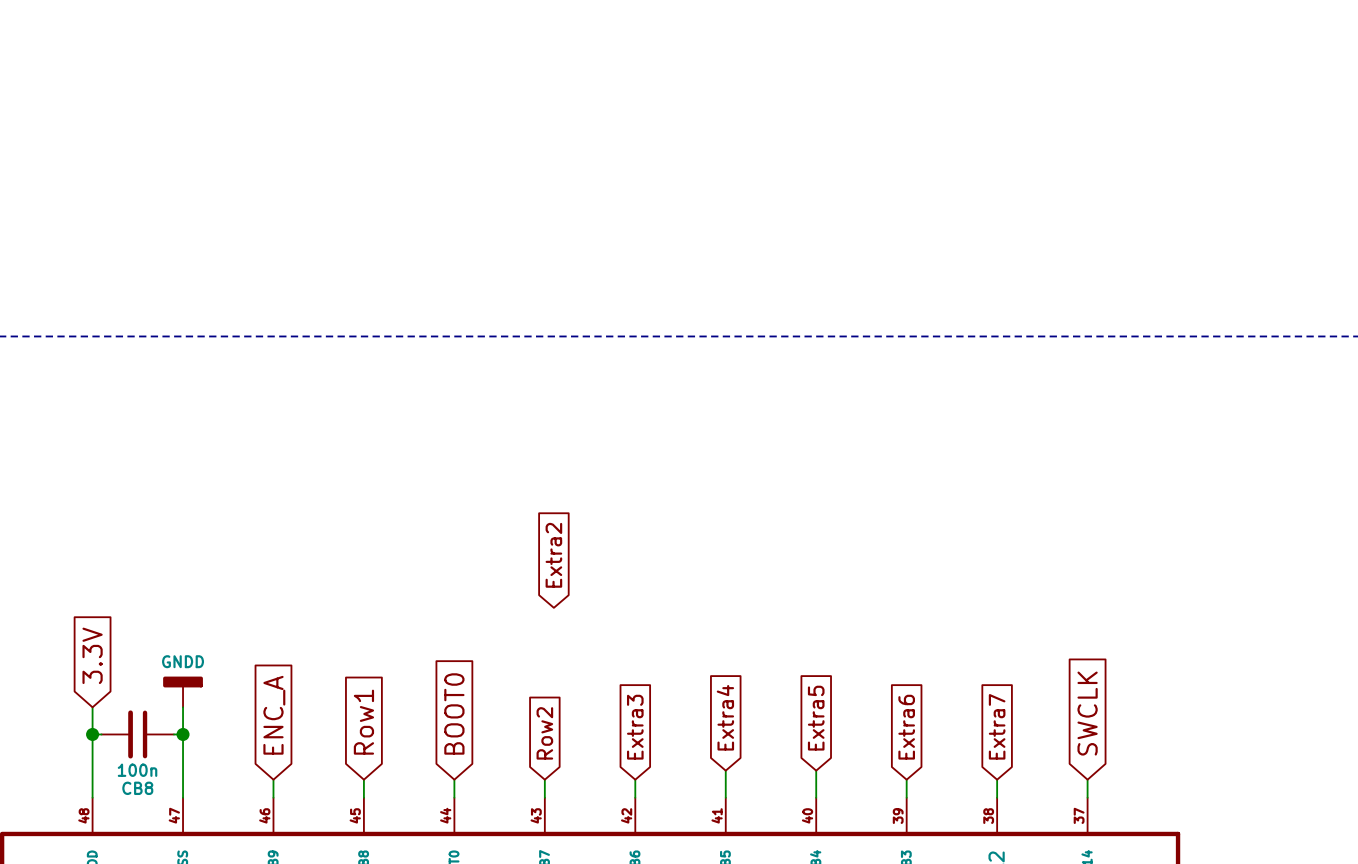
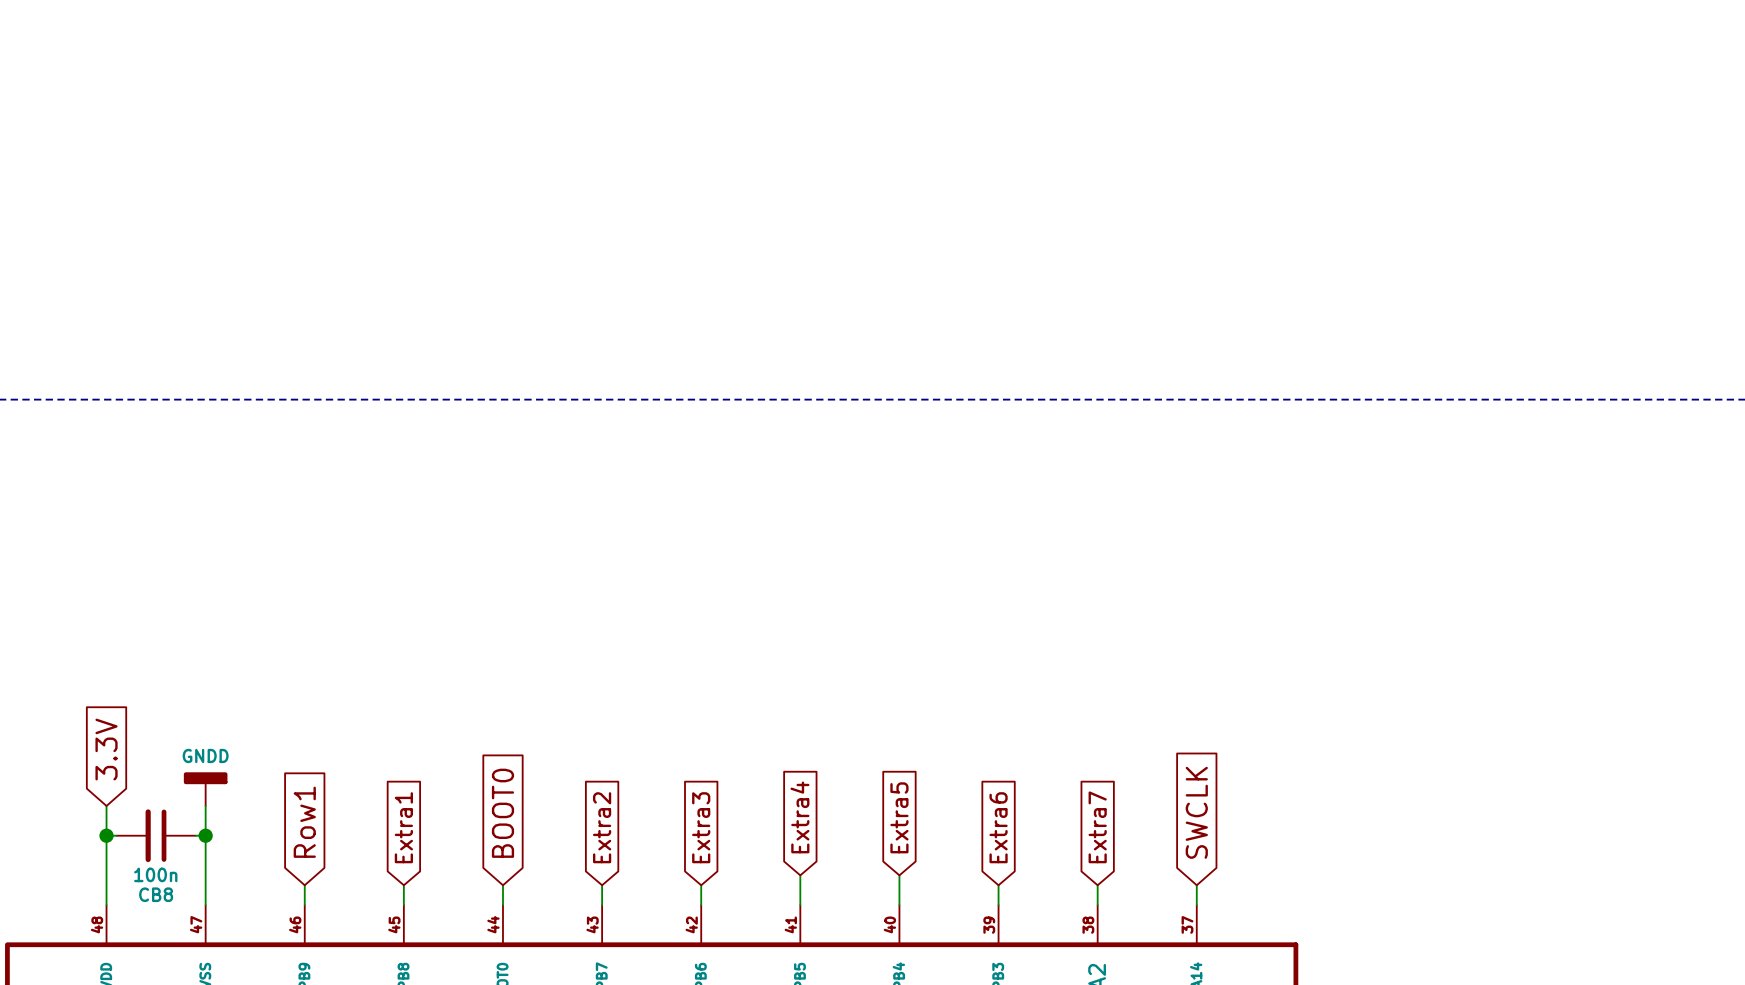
global label: Extra2 (553, 555) -> none
global label: ENC_A (274, 715) -> Row1 (304, 822)
global label: Row1 (363, 722) -> Extra1 (403, 827)
global label: Row2 (544, 733) -> Extra2 (602, 827)

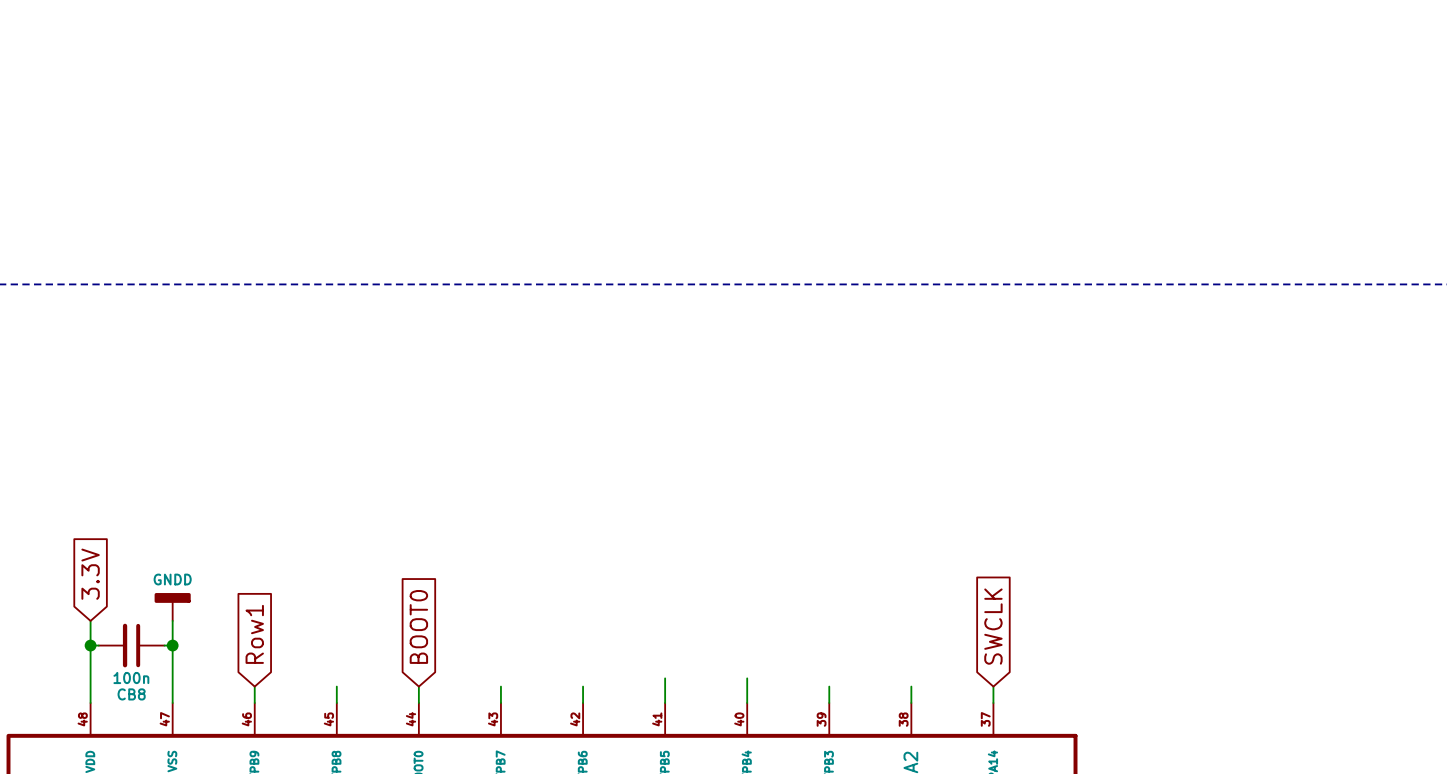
global label: Extra4 (799, 817) -> none
global label: Extra5 (899, 817) -> none
global label: Extra1 (403, 827) -> none
global label: Extra2 (602, 827) -> none
global label: Extra3 (701, 827) -> none
global label: Extra6 (998, 827) -> none
global label: Extra7 (1097, 827) -> none

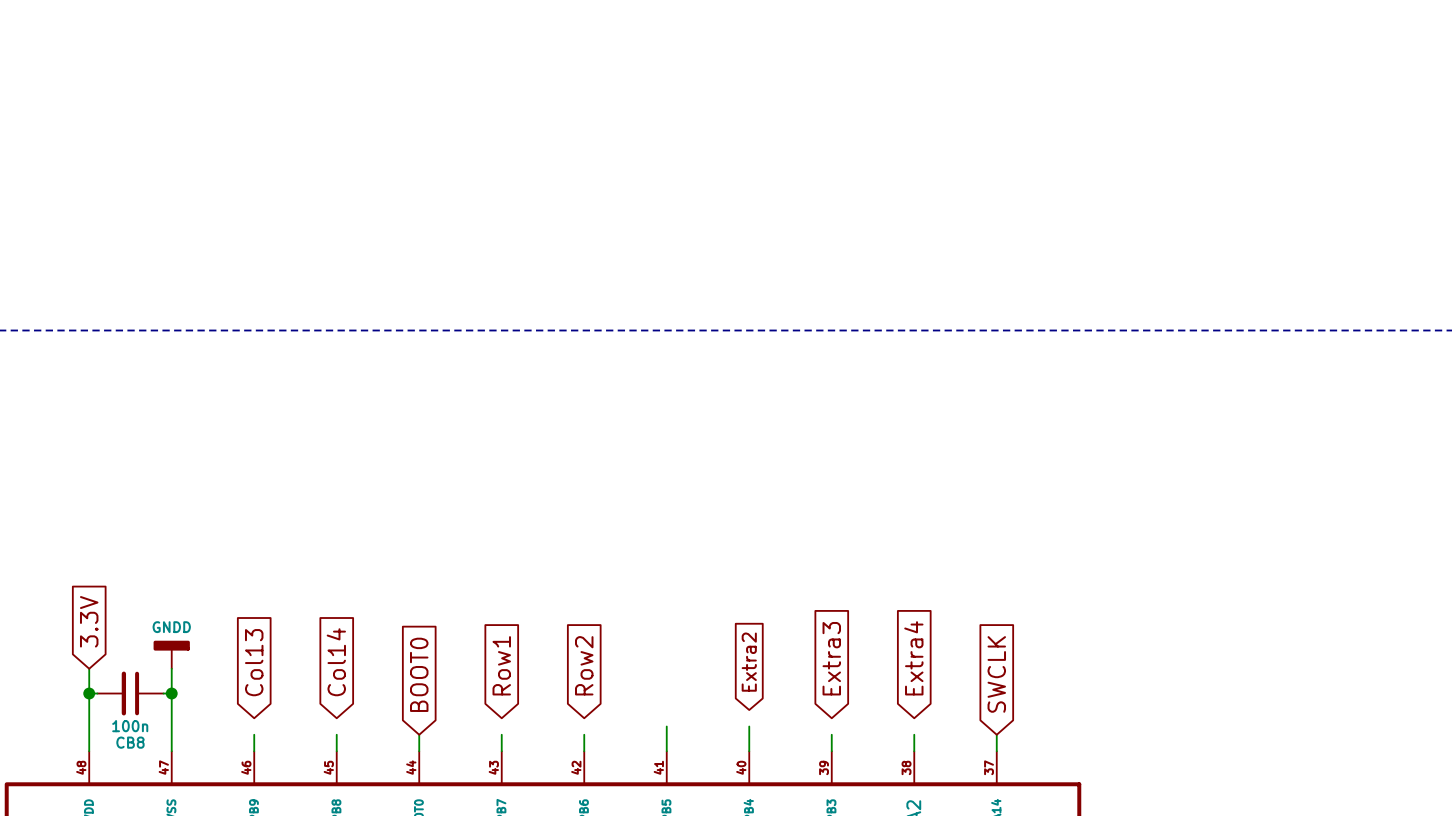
global label: none -> Extra3 (831, 658)
global label: none -> Extra4 (913, 658)
global label: none -> Col13 (254, 662)
global label: none -> Col14 (336, 662)
global label: none -> Extra2 (749, 662)
global label: none -> Row2 (584, 665)
global label position: Row1 (254, 634) -> Row1 (501, 665)

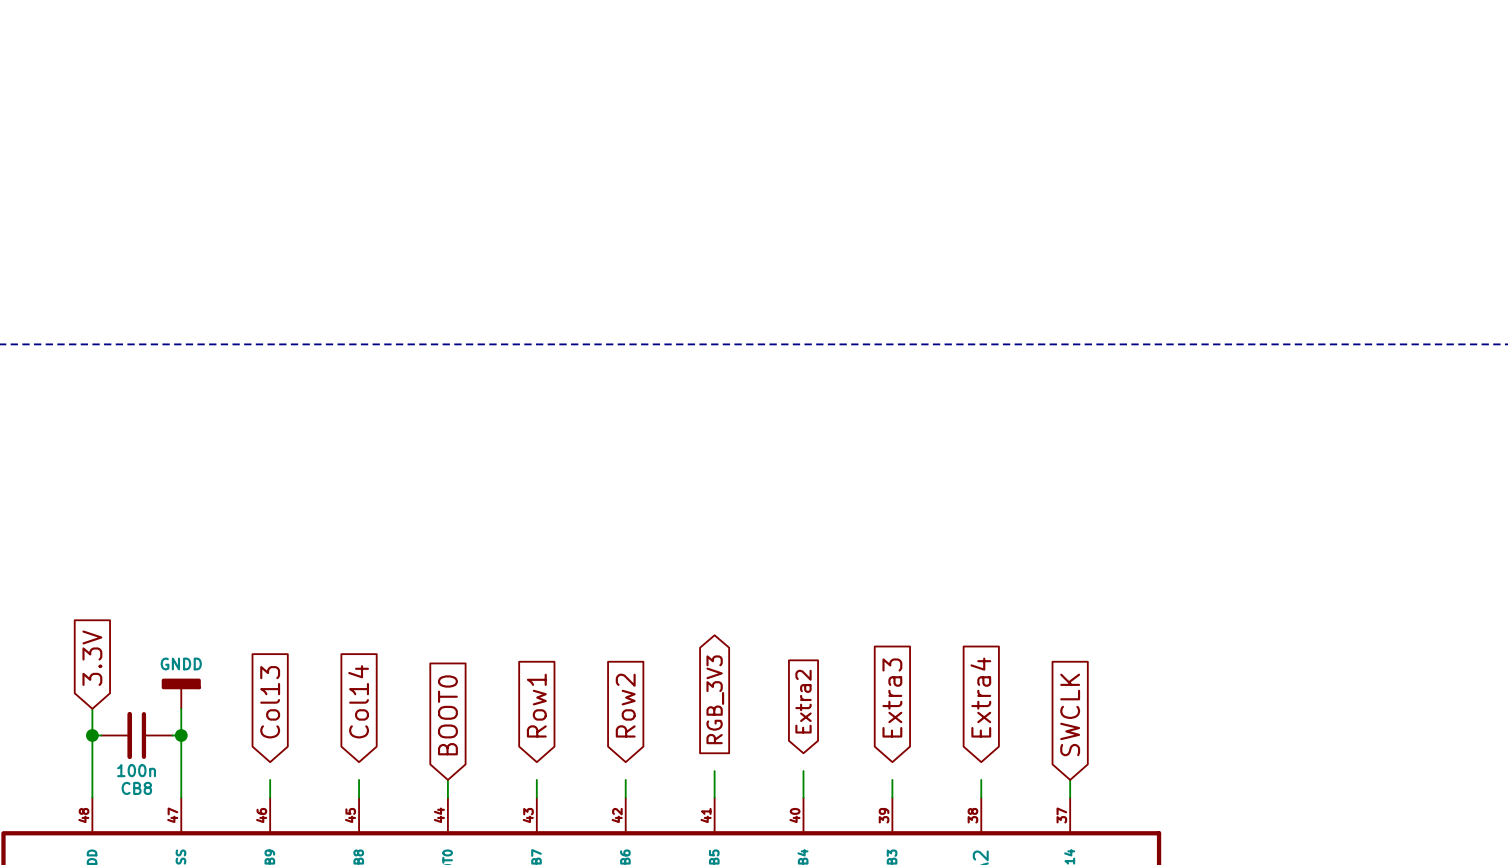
global label: none -> RGB_3V3 (715, 699)

